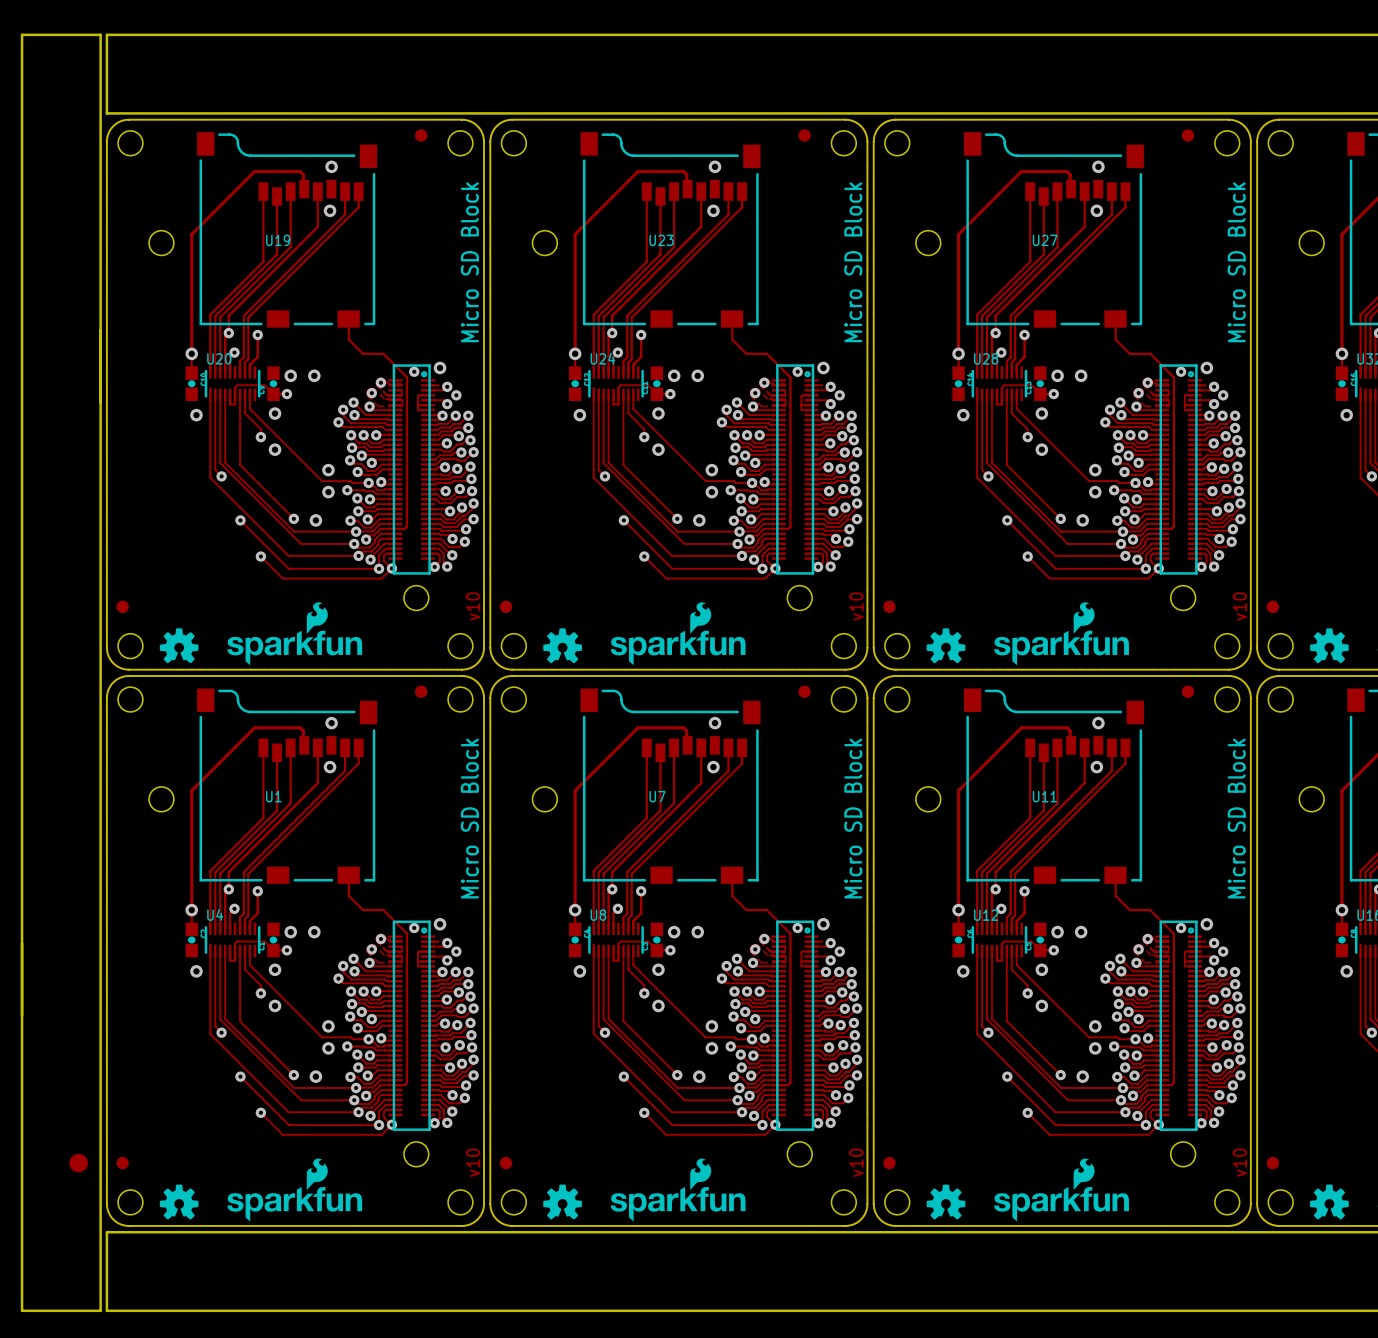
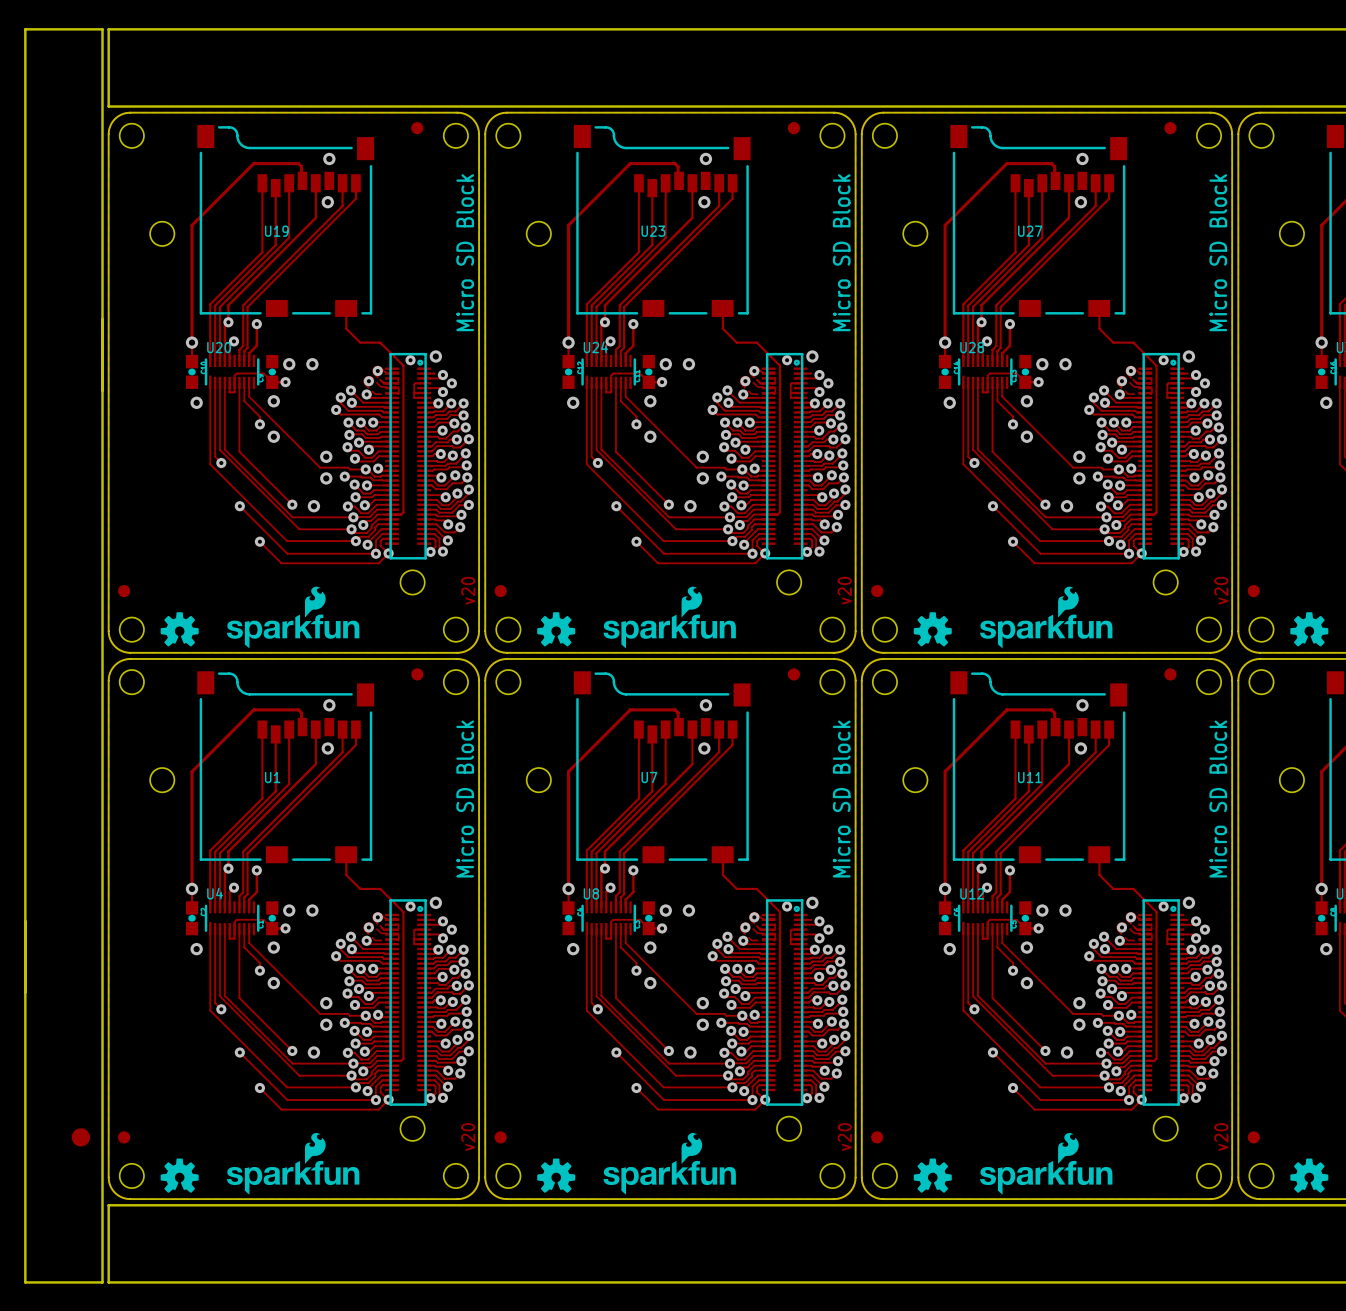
text: v10 (473, 606) -> v20 (468, 590)
text: v10 (856, 606) -> v20 (844, 590)
text: v10 (1239, 606) -> v20 (1221, 590)
text: v10 (473, 1162) -> v20 (468, 1137)
text: v10 (856, 1162) -> v20 (844, 1137)
text: v10 (1239, 1162) -> v20 (1221, 1137)

